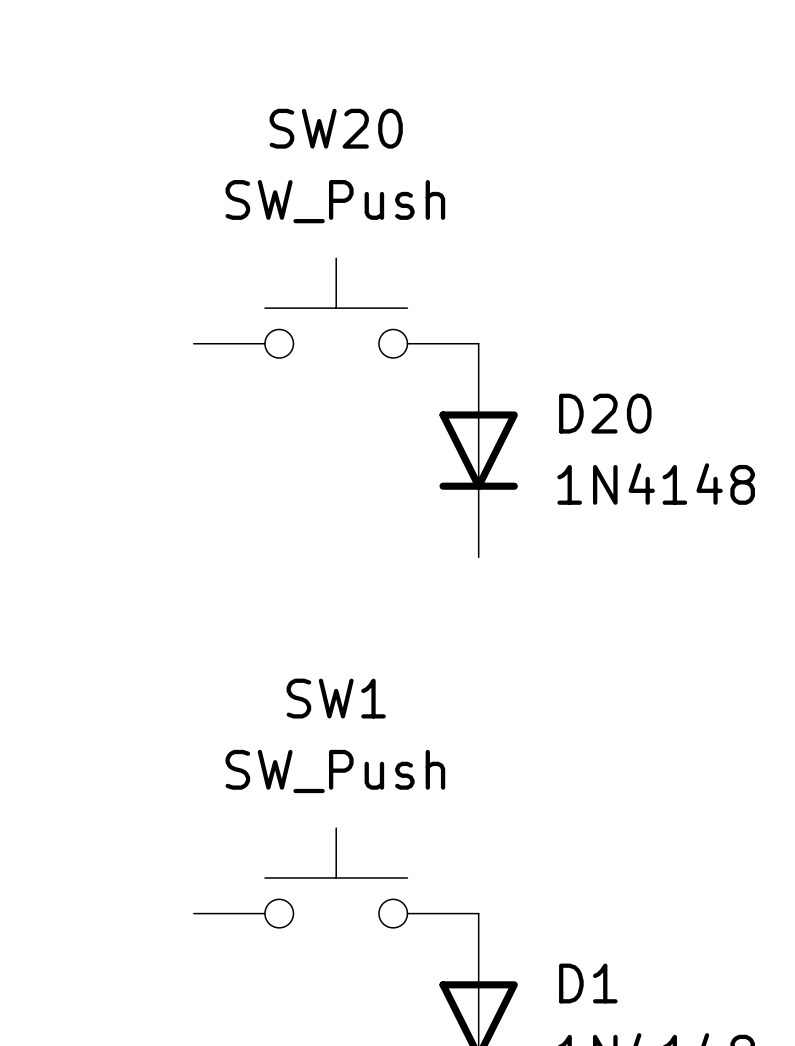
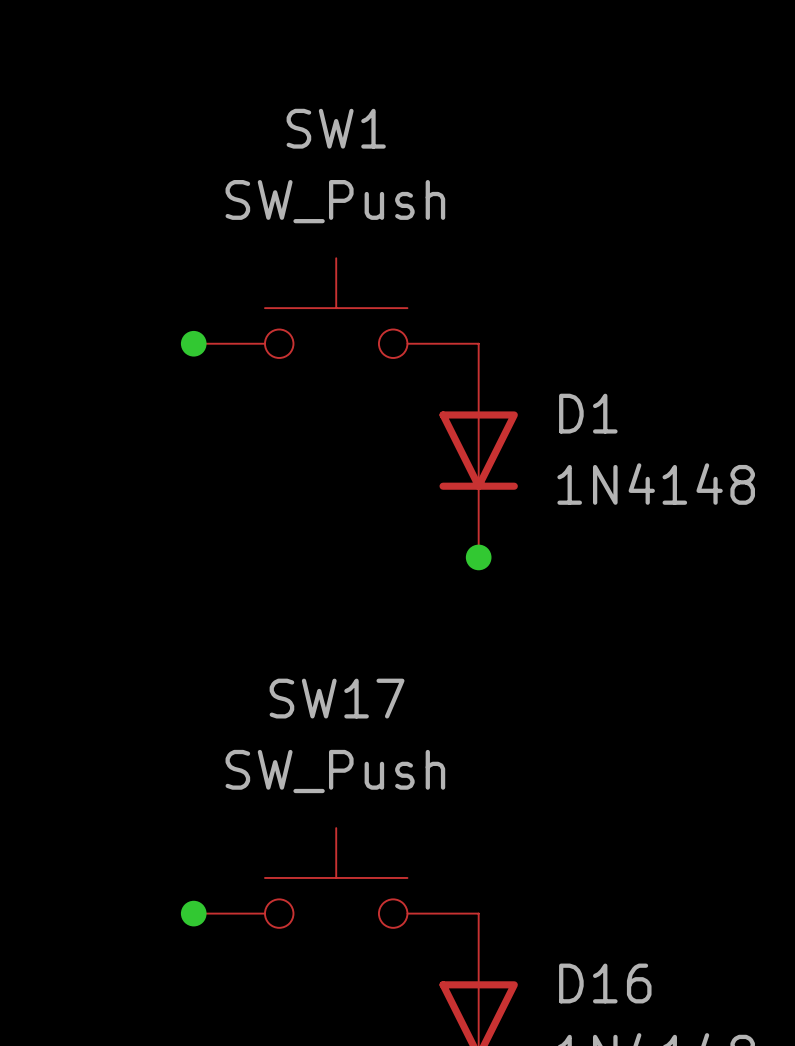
SW20 name: SW20 (336, 128) -> SW1 (336, 128)
junction: none -> (193, 343)
D20 name: D20 (605, 413) -> D1 (588, 413)
junction: none -> (478, 557)
SW1 name: SW1 (336, 698) -> SW17 (337, 698)
junction: none -> (193, 913)
D1 name: D1 (588, 983) -> D16 (605, 983)

